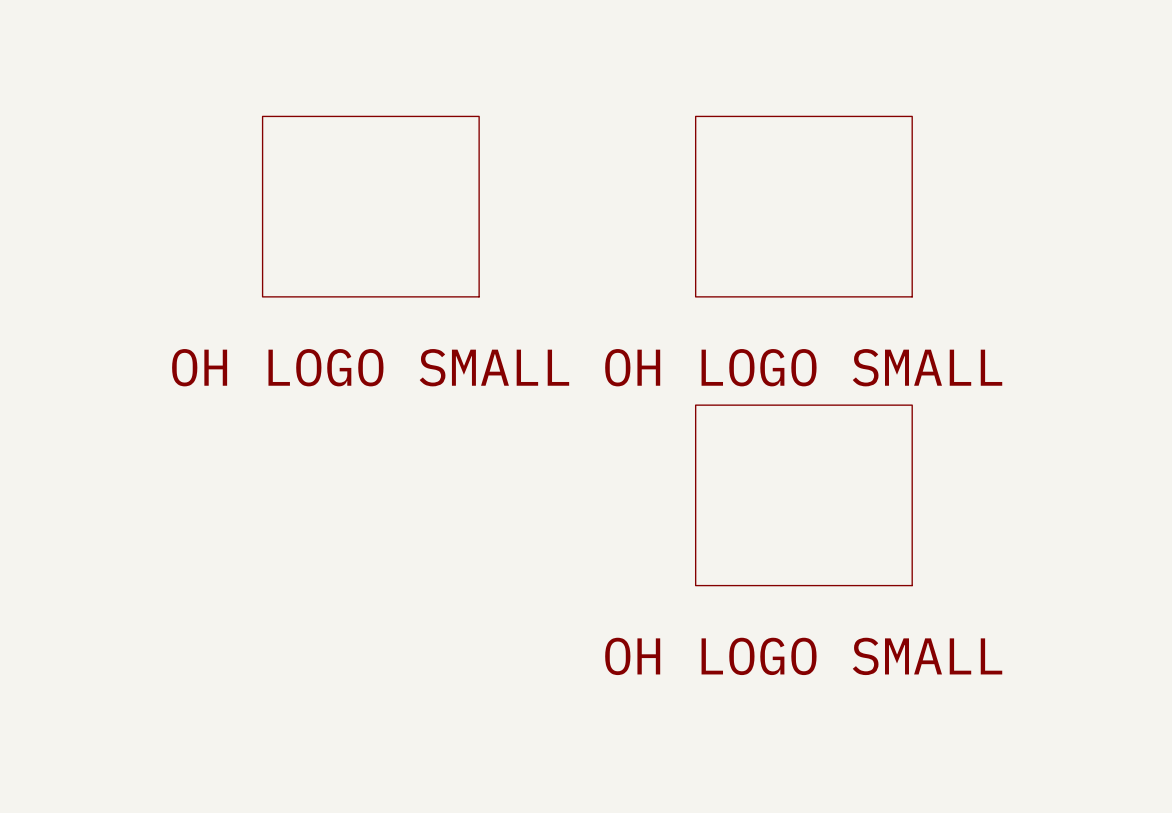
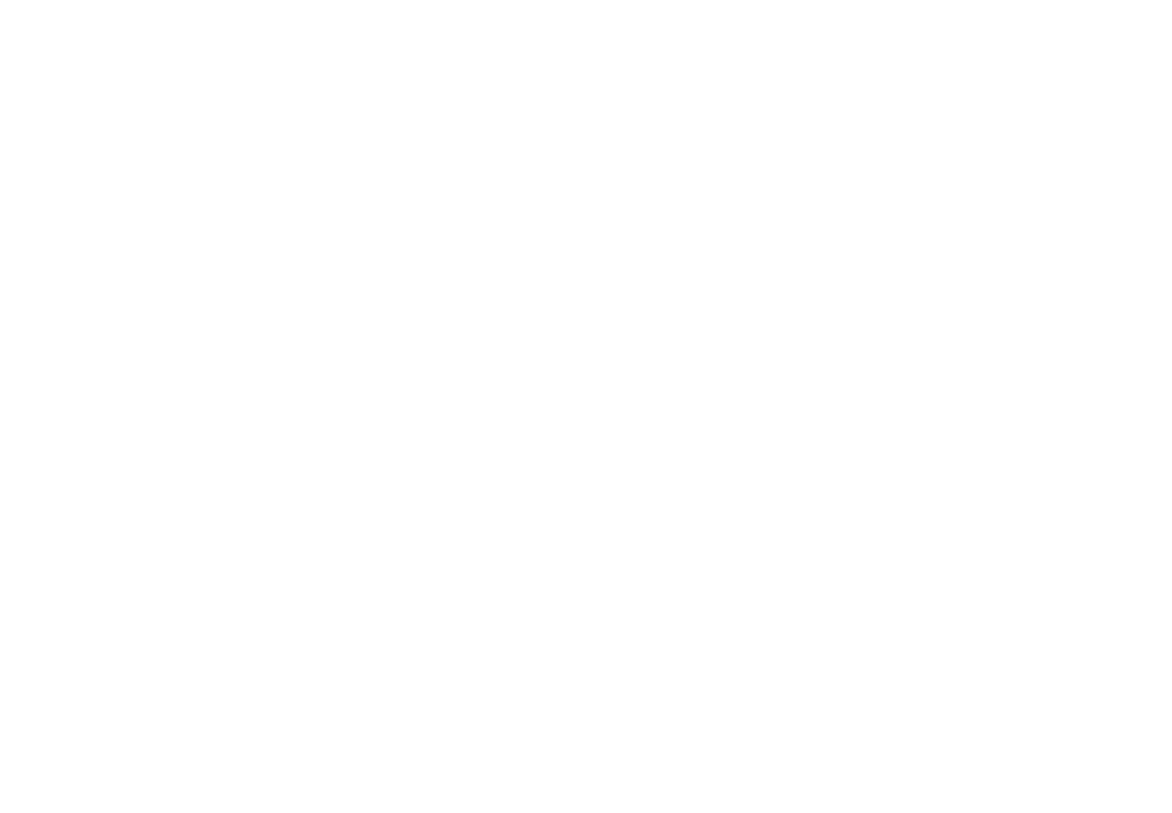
part: (370, 206) -> none
part: (803, 206) -> none
part: (803, 495) -> none

